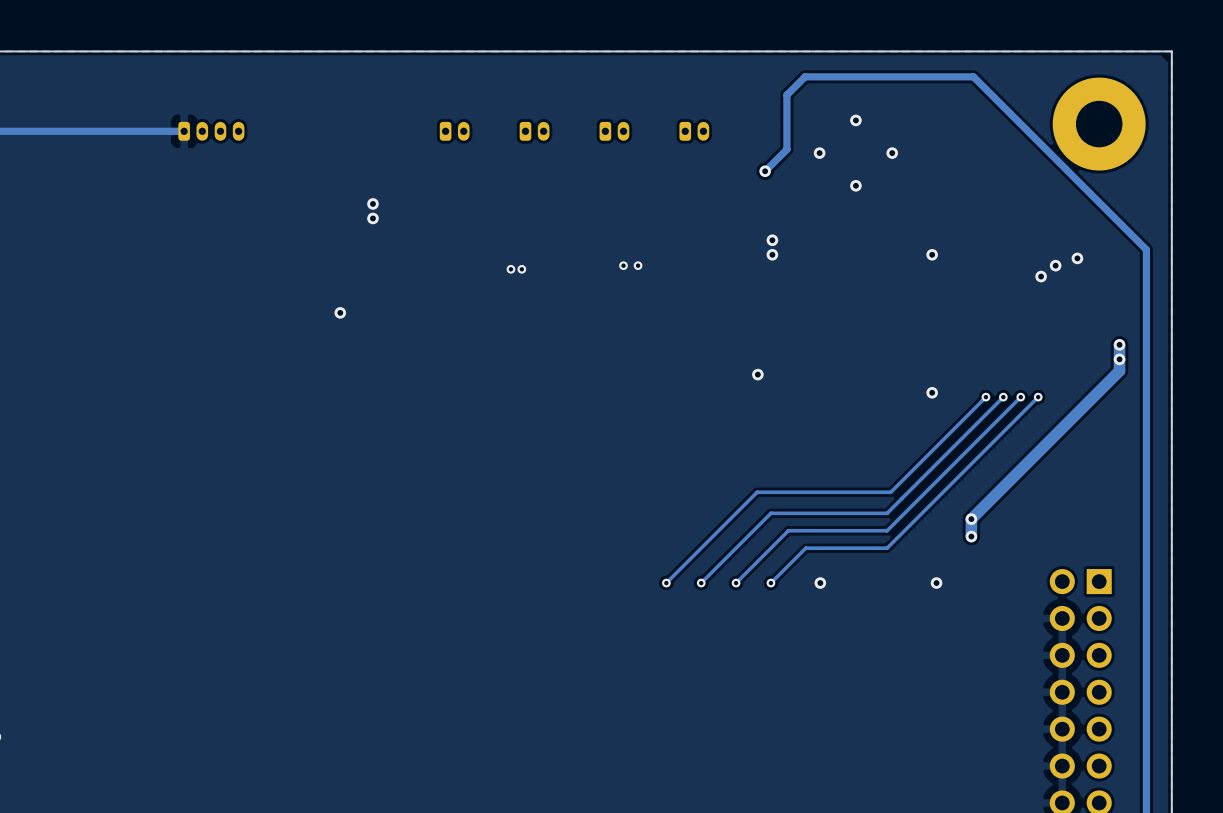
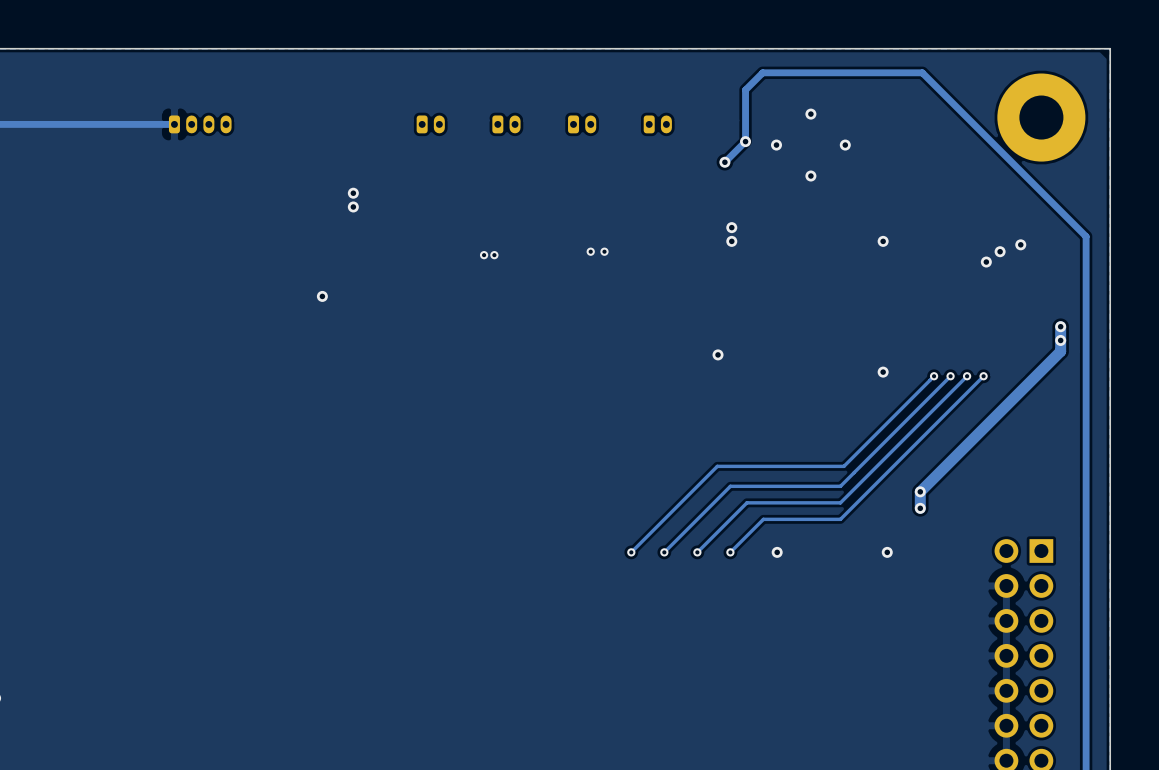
via: none -> (745, 141)

